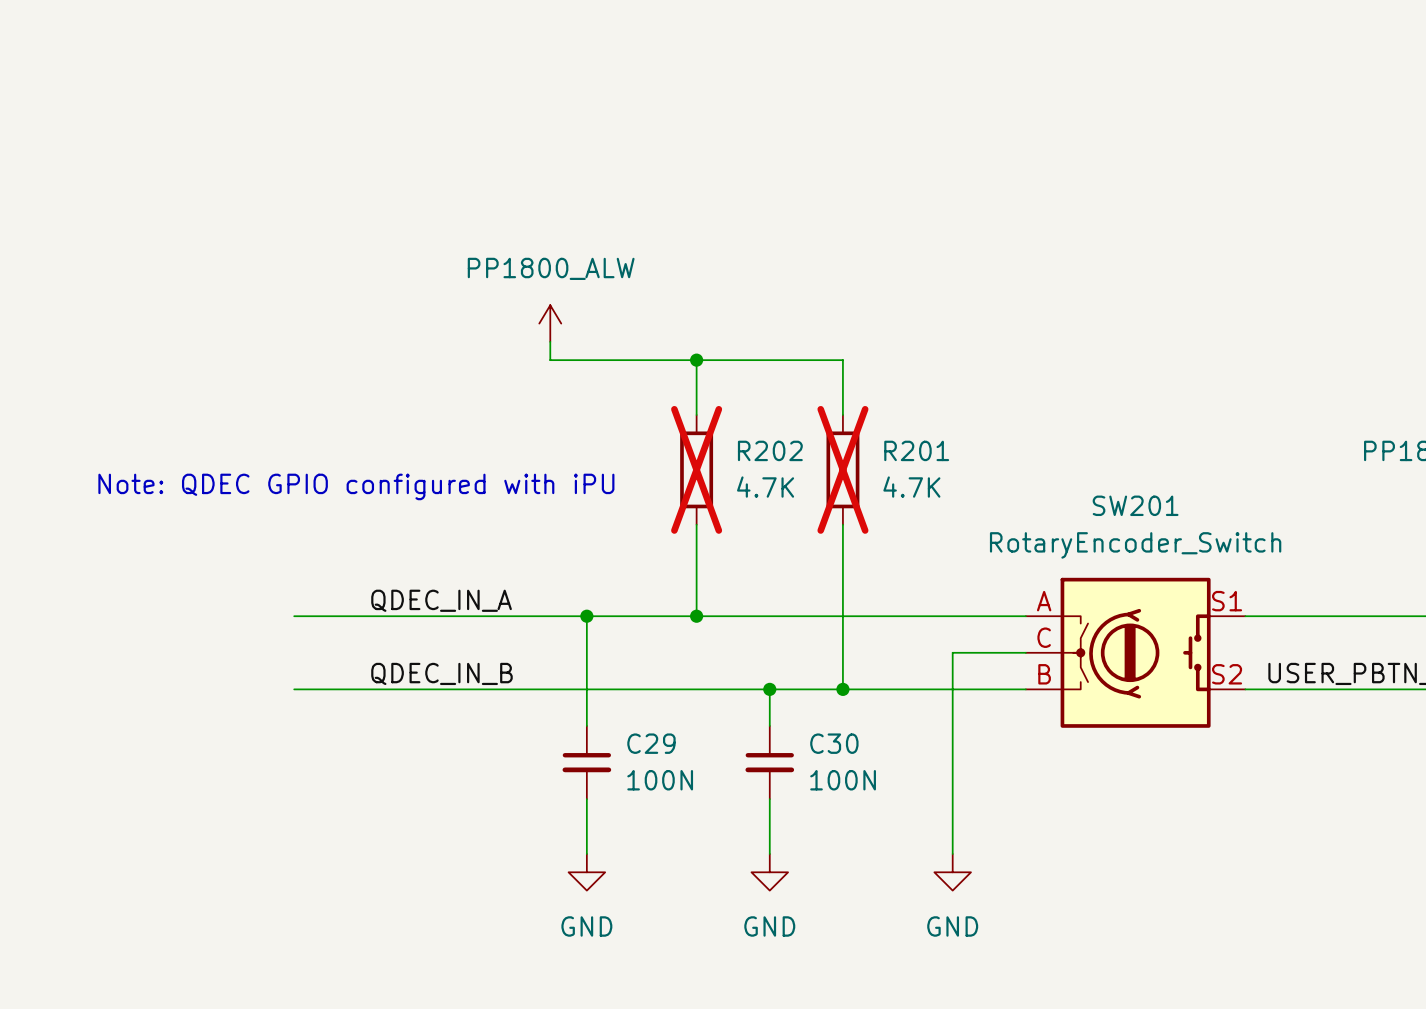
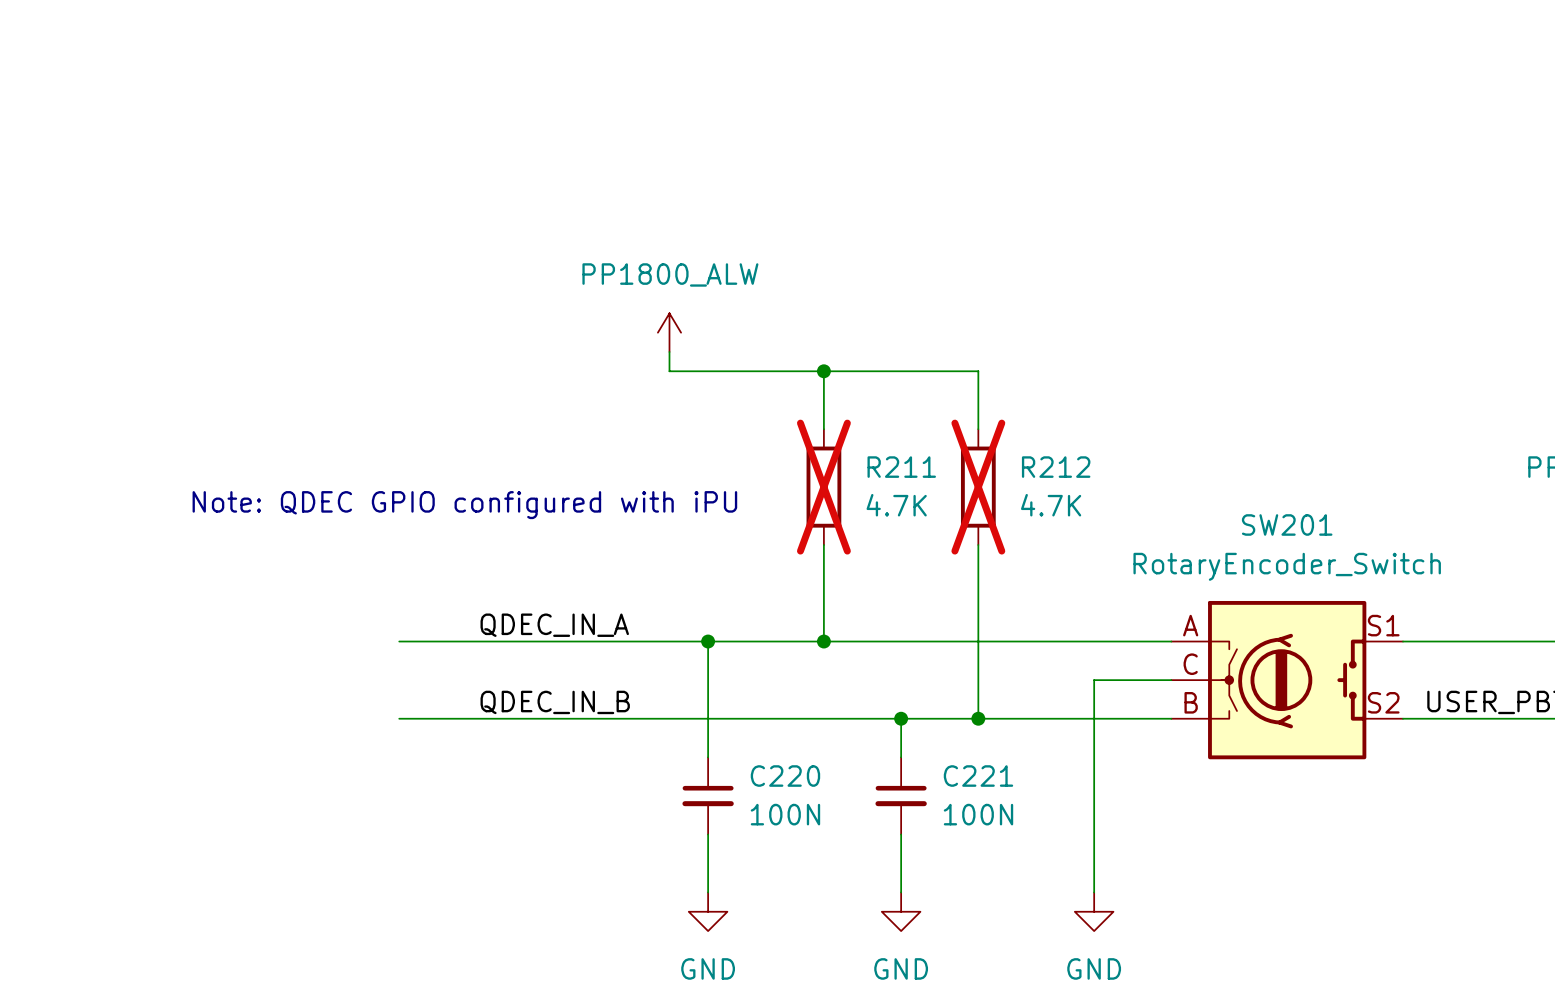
R202 name: R202 (770, 450) -> R211 (901, 467)
R201 name: R201 (916, 450) -> R212 (1056, 467)
C29 name: C29 (651, 743) -> C220 (785, 776)
C30 name: C30 (834, 743) -> C221 (978, 776)

